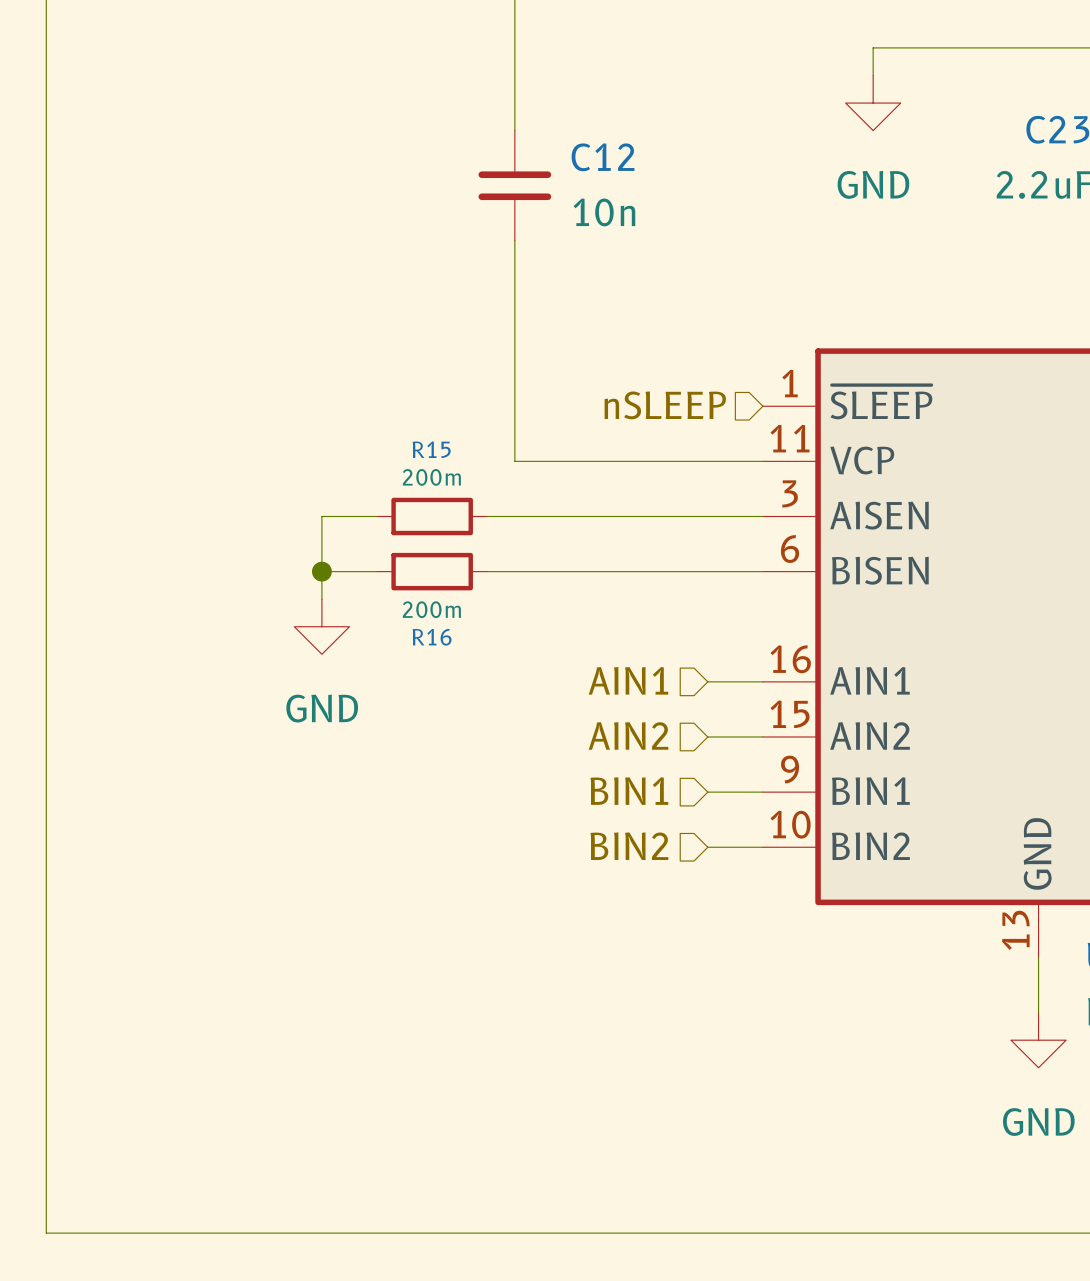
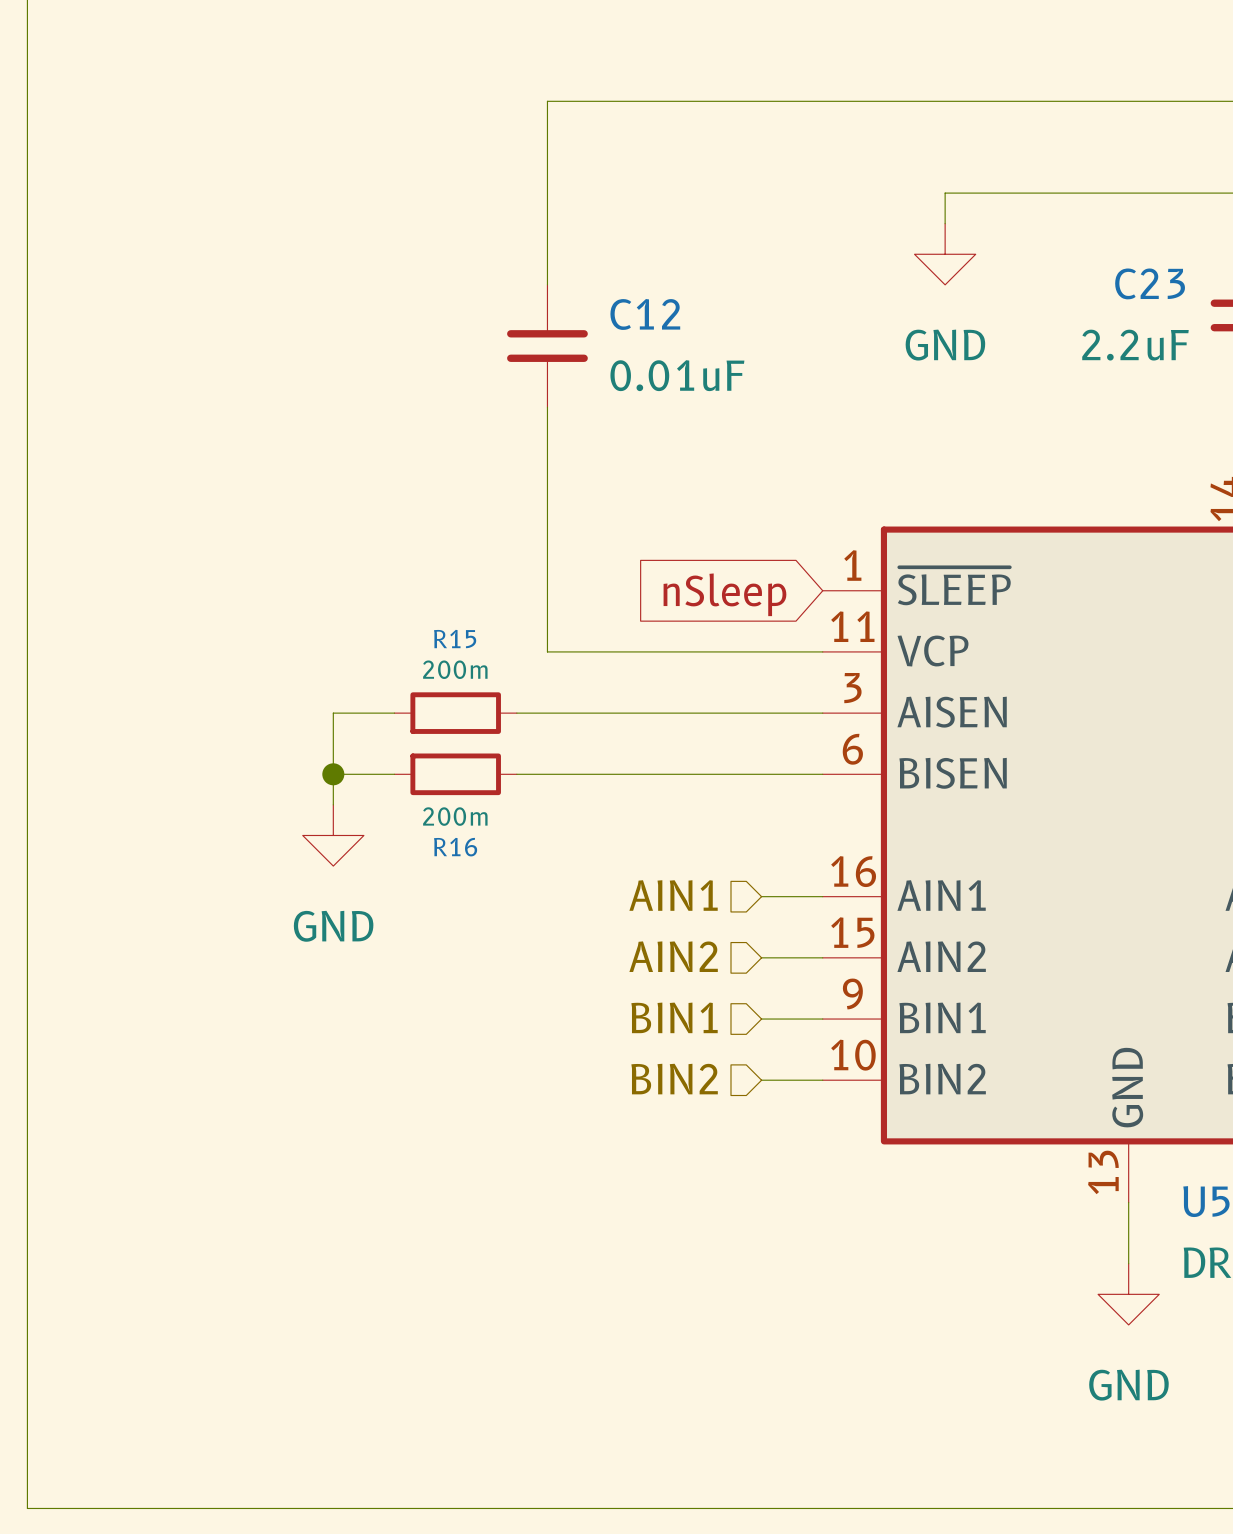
C12 value: 10n (604, 212) -> 0.01uF (677, 375)
hierarchical label: nSLEEP (665, 405) -> none
global label: none -> nSleep (724, 594)

